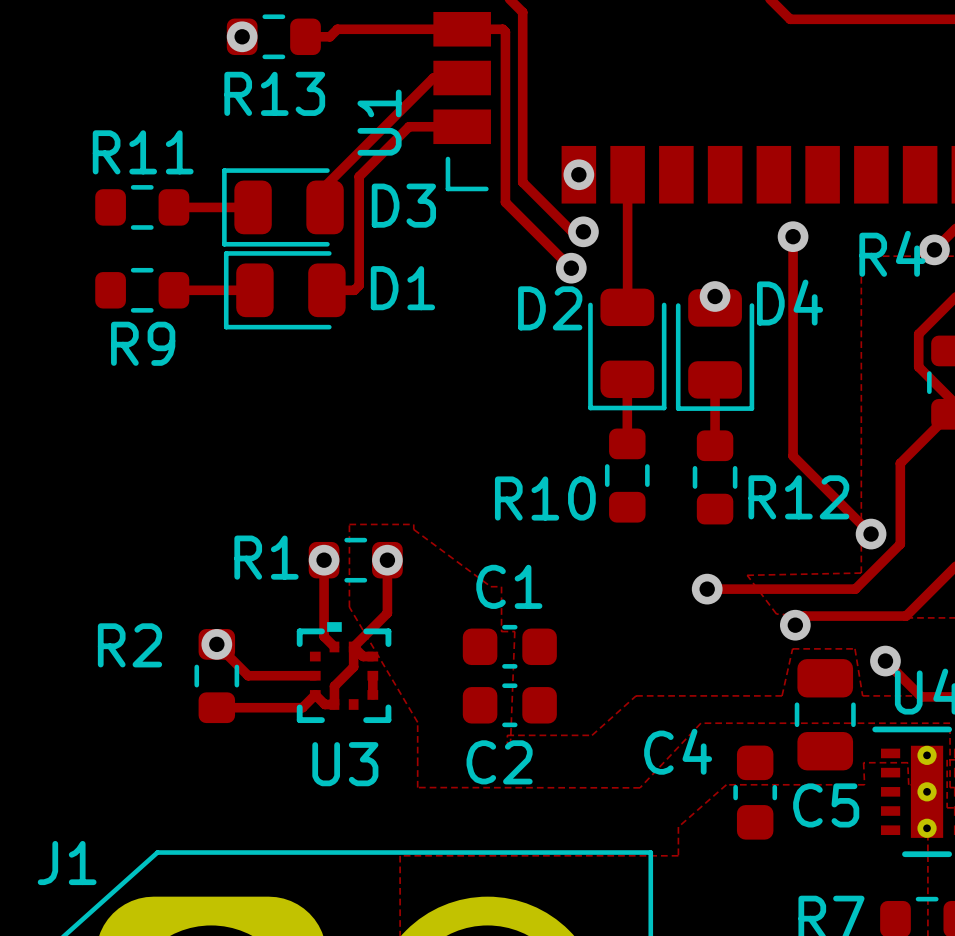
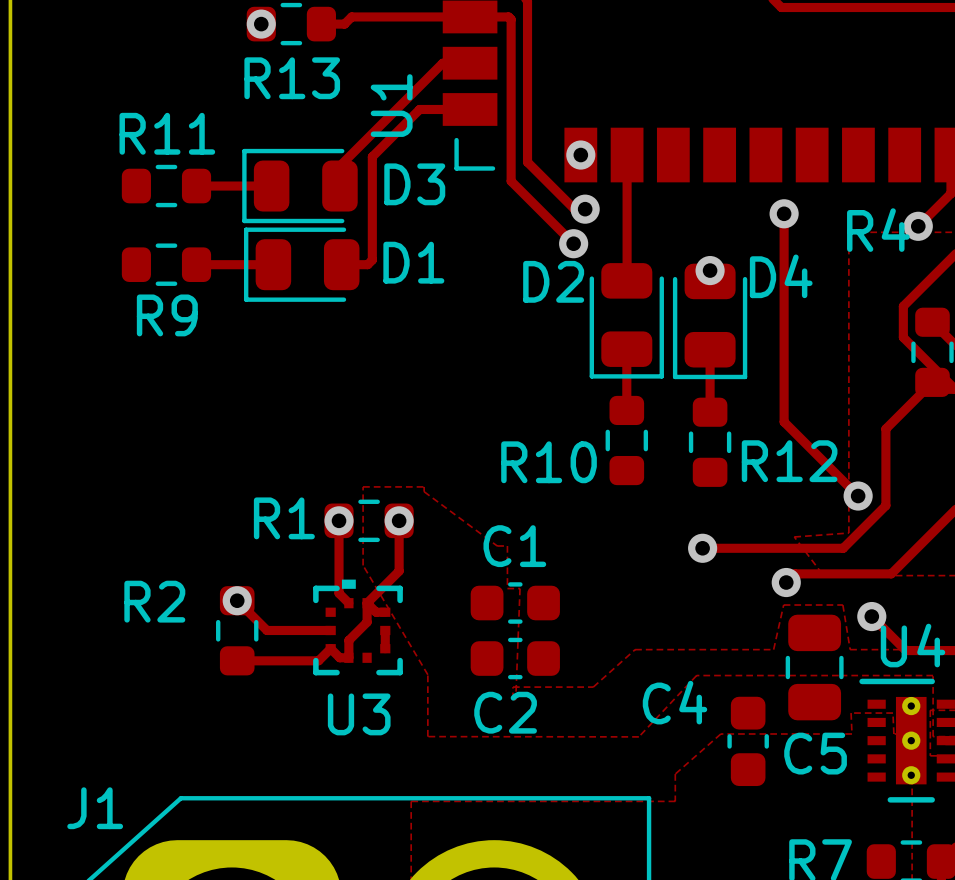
zone outline: (861, 573) (747, 575) (776, 614) (842, 618) -> (848, 533) (794, 536) (822, 573) (831, 576)

